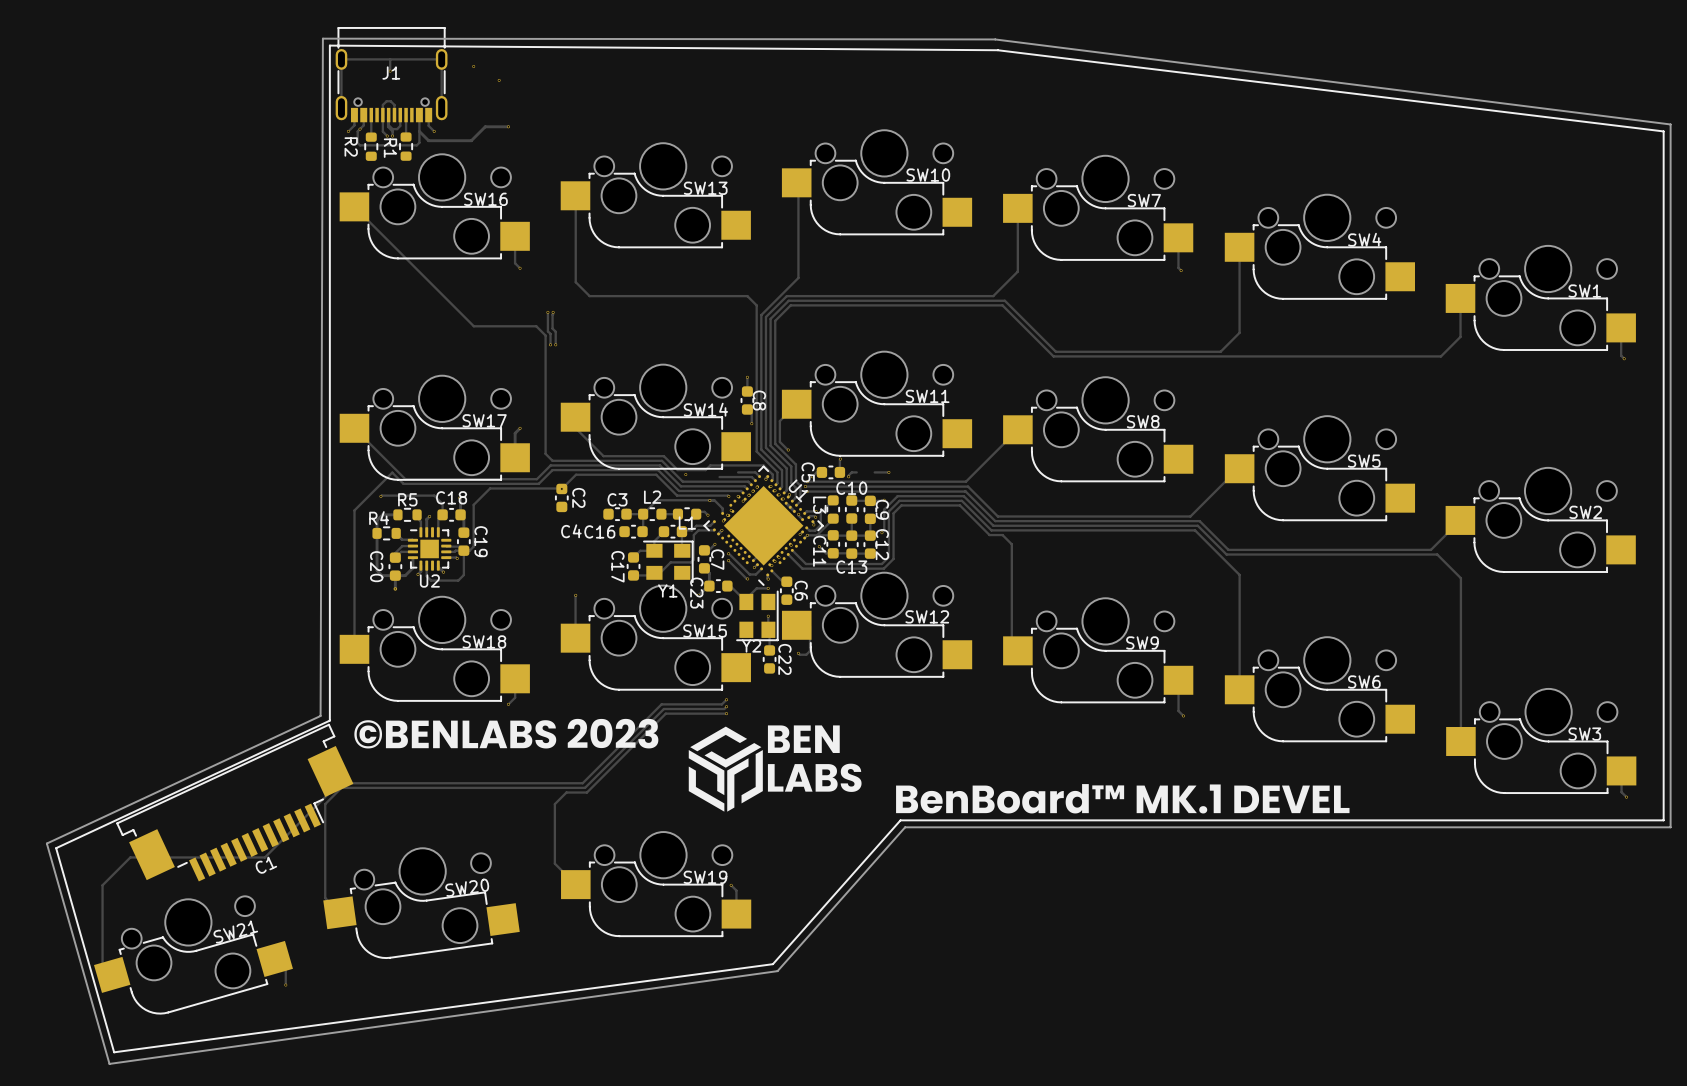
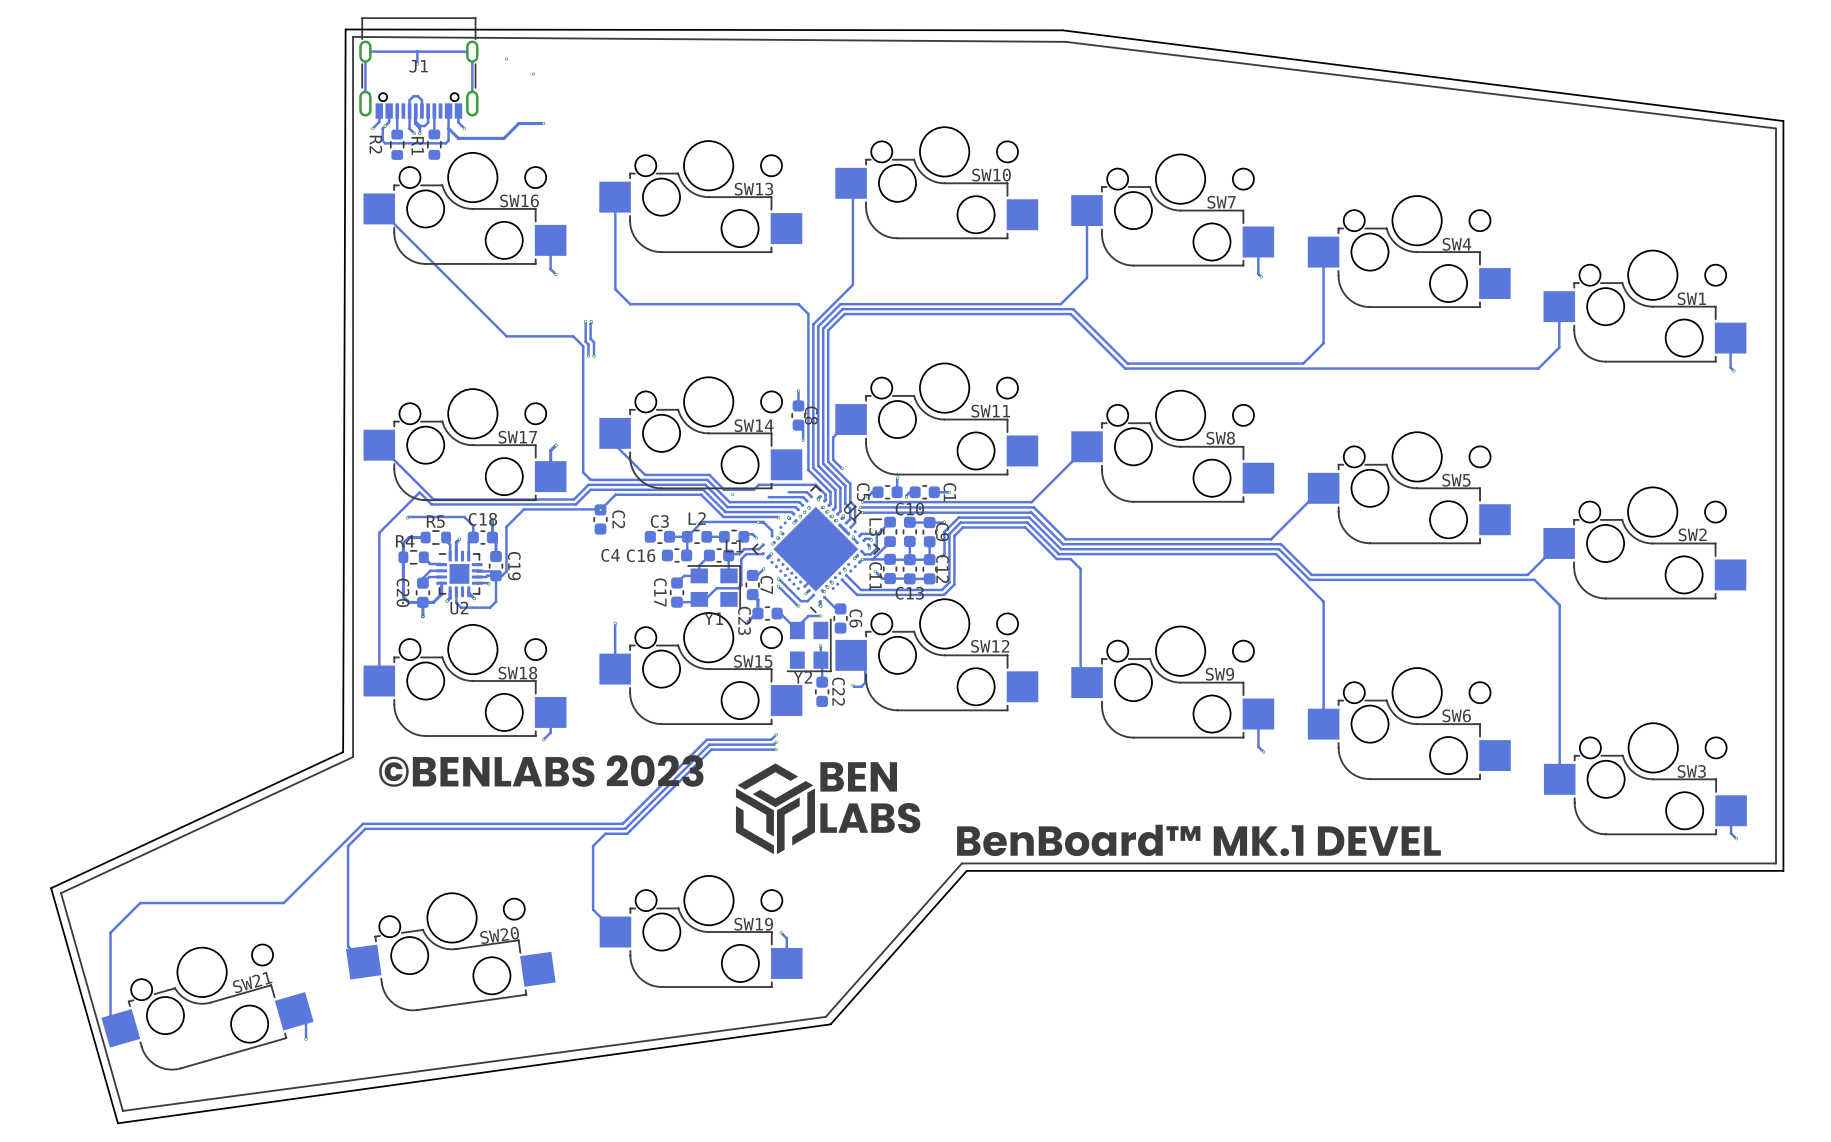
C1 footprint: [116, 724, 354, 882] -> [909, 485, 940, 500]
C1 name position: C1 (266, 865) -> C1 (949, 492)

